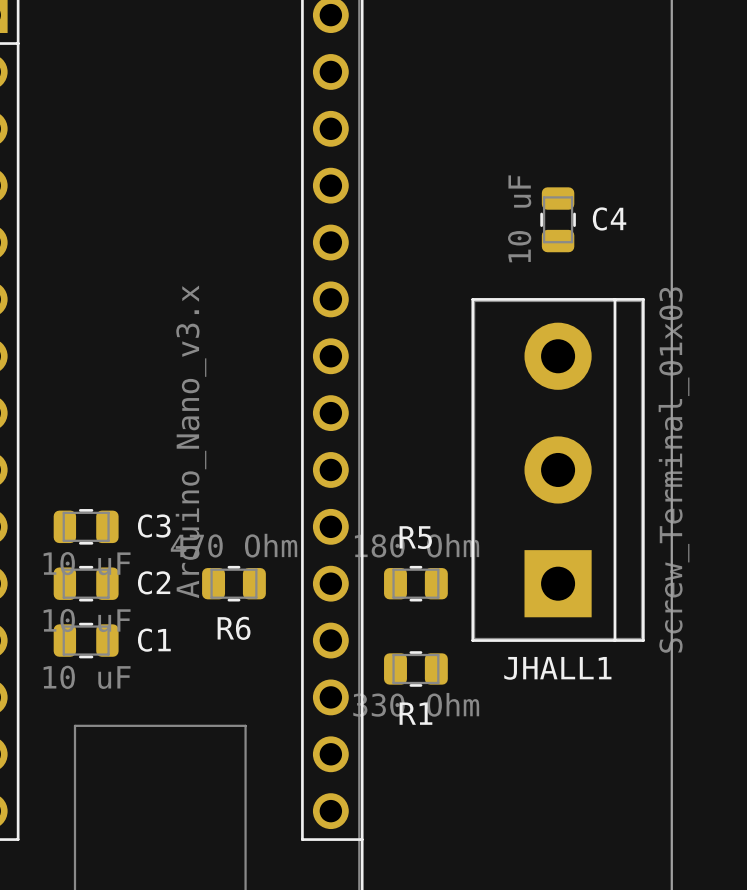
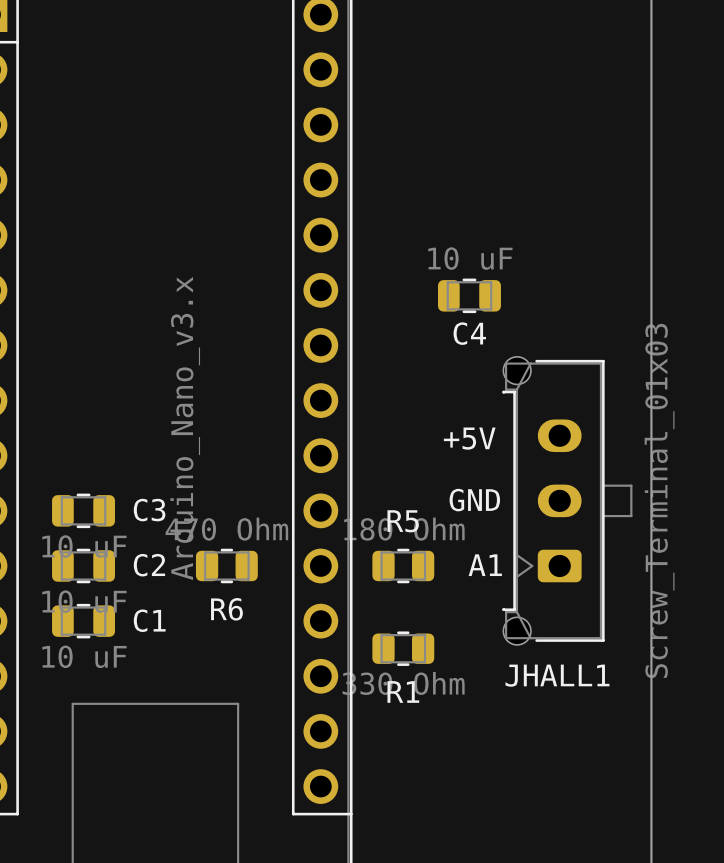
C4 rotation: 0° (558, 219) -> 90° clockwise (469, 295)
C4 position: (558, 219) -> (469, 295)
JHALL1 footprint: [471, 298, 645, 642] -> [502, 356, 633, 645]
text: none -> +5V (469, 438)
text: none -> GND (474, 500)
text: none -> A1 (485, 565)

